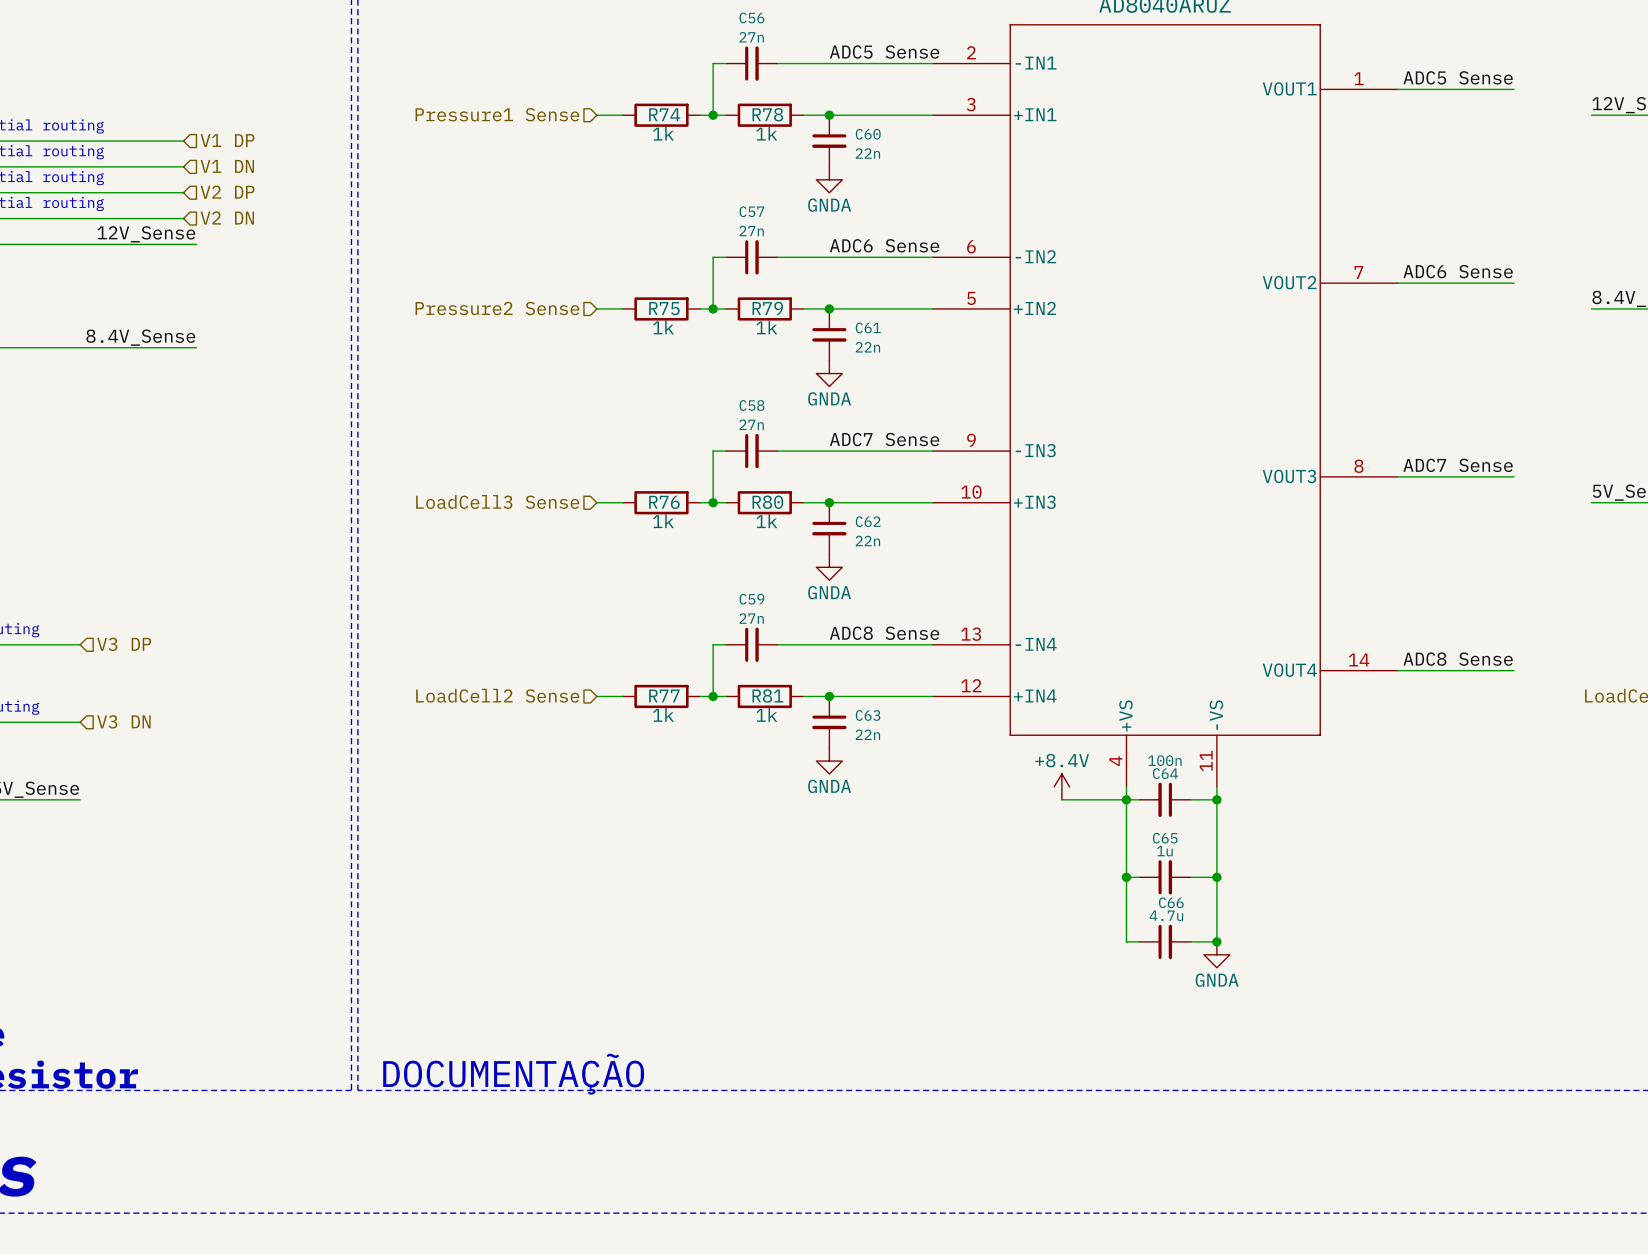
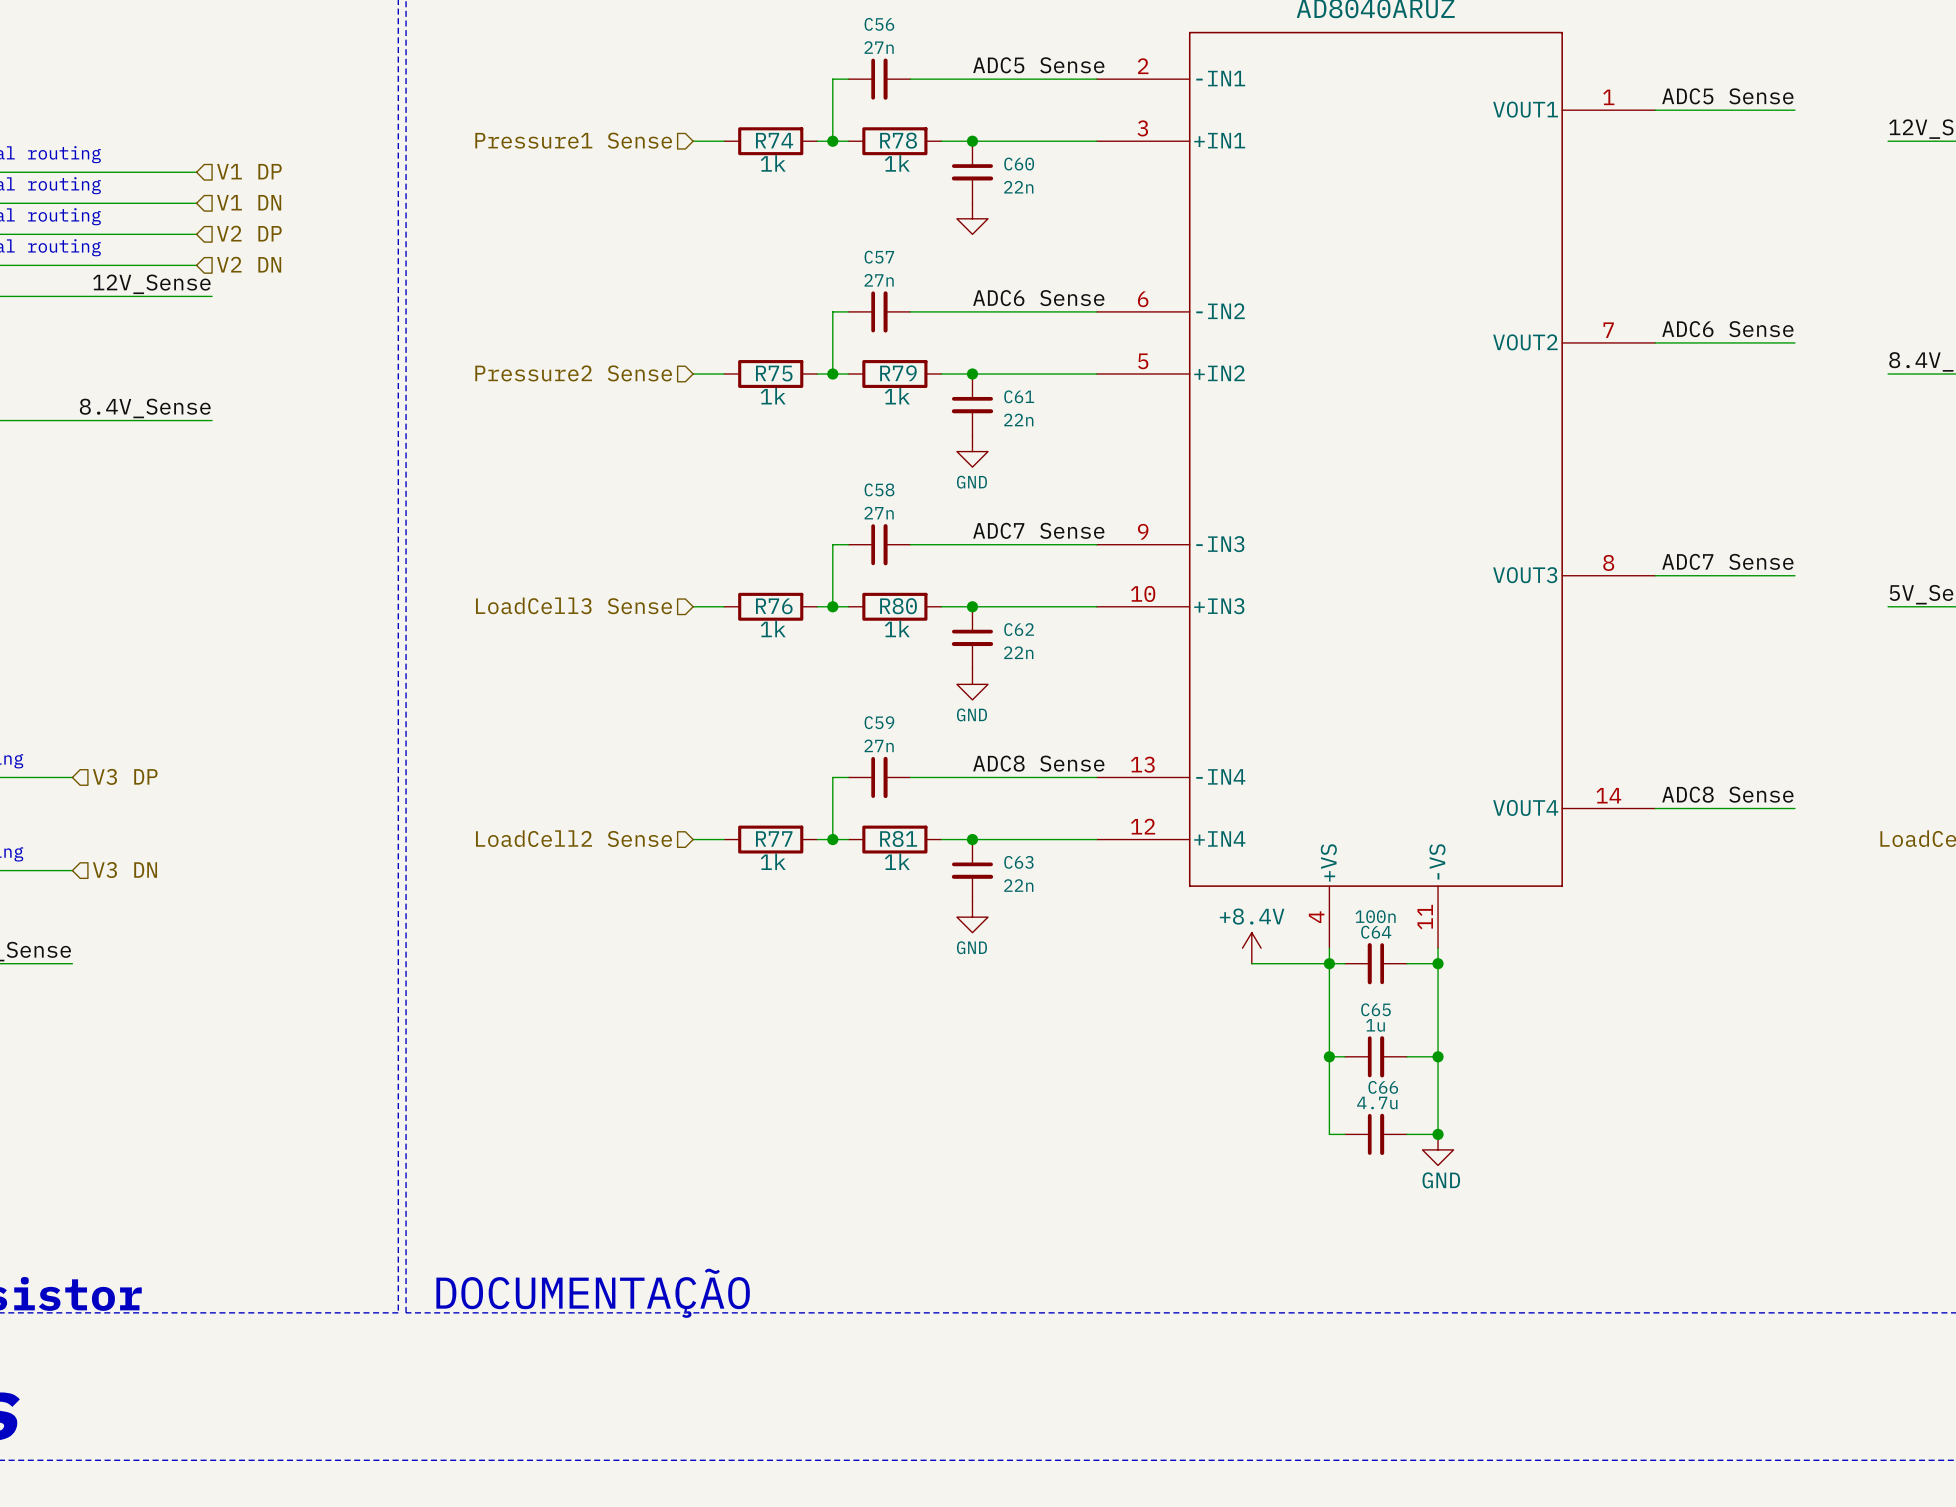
power symbol text: GNDA (829, 205) -> none
power symbol: GNDA (829, 373) -> GND (972, 451)
power symbol: GNDA (829, 567) -> GND (972, 684)
power symbol: GNDA (829, 761) -> GND (972, 917)
power symbol: GNDA (1216, 954) -> GND (1438, 1149)

